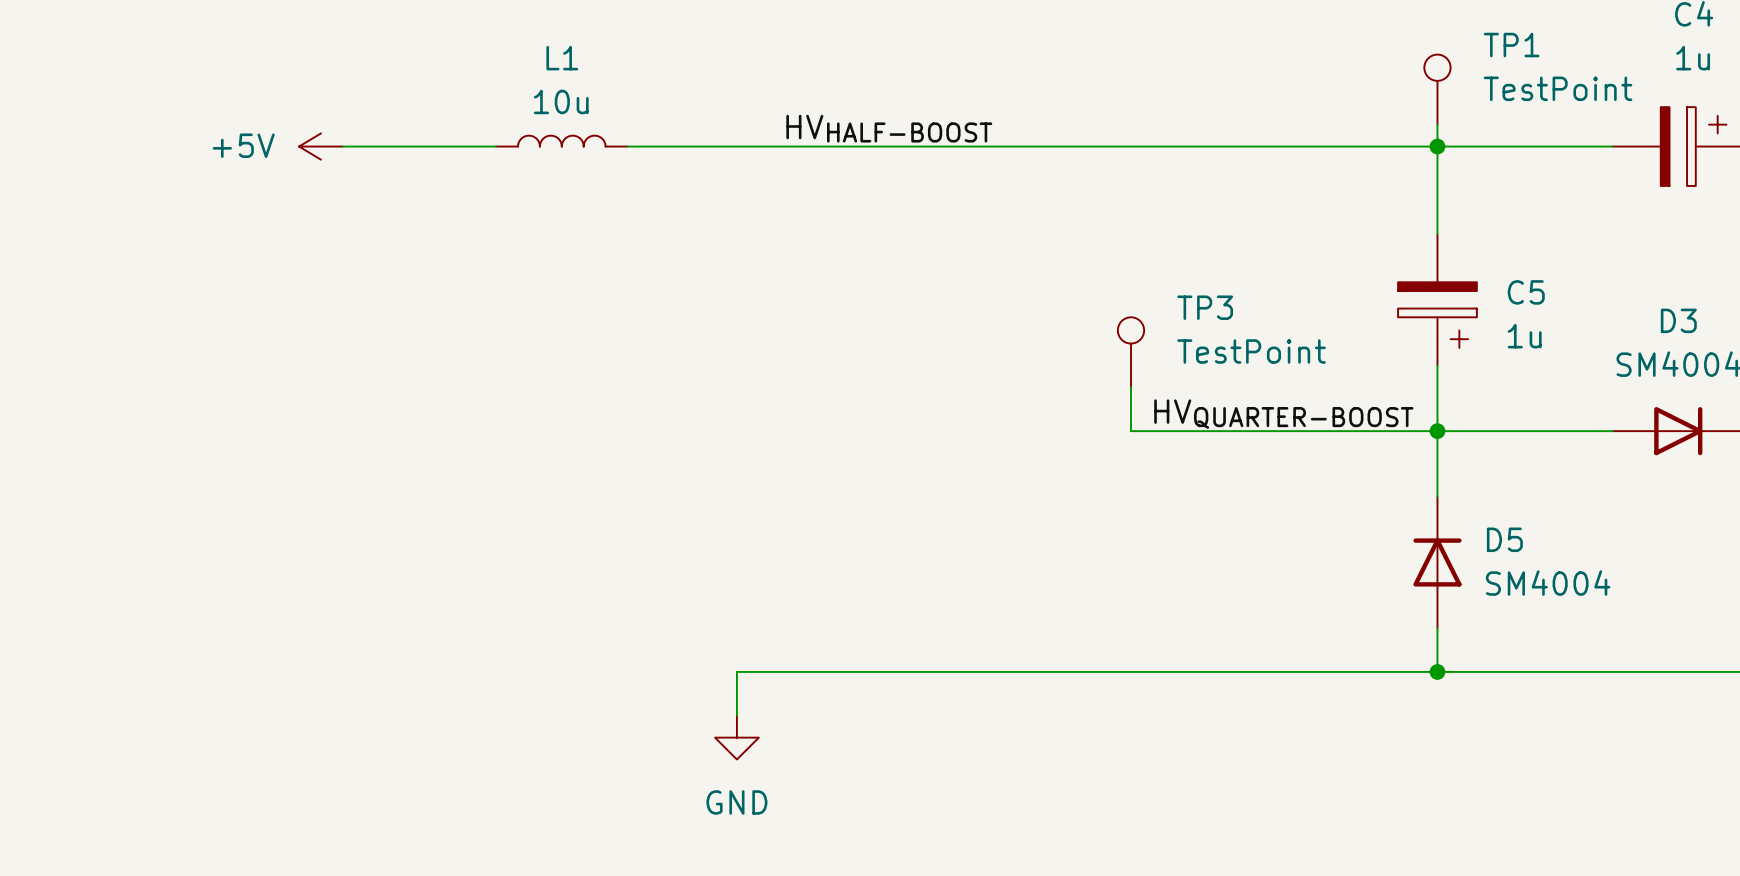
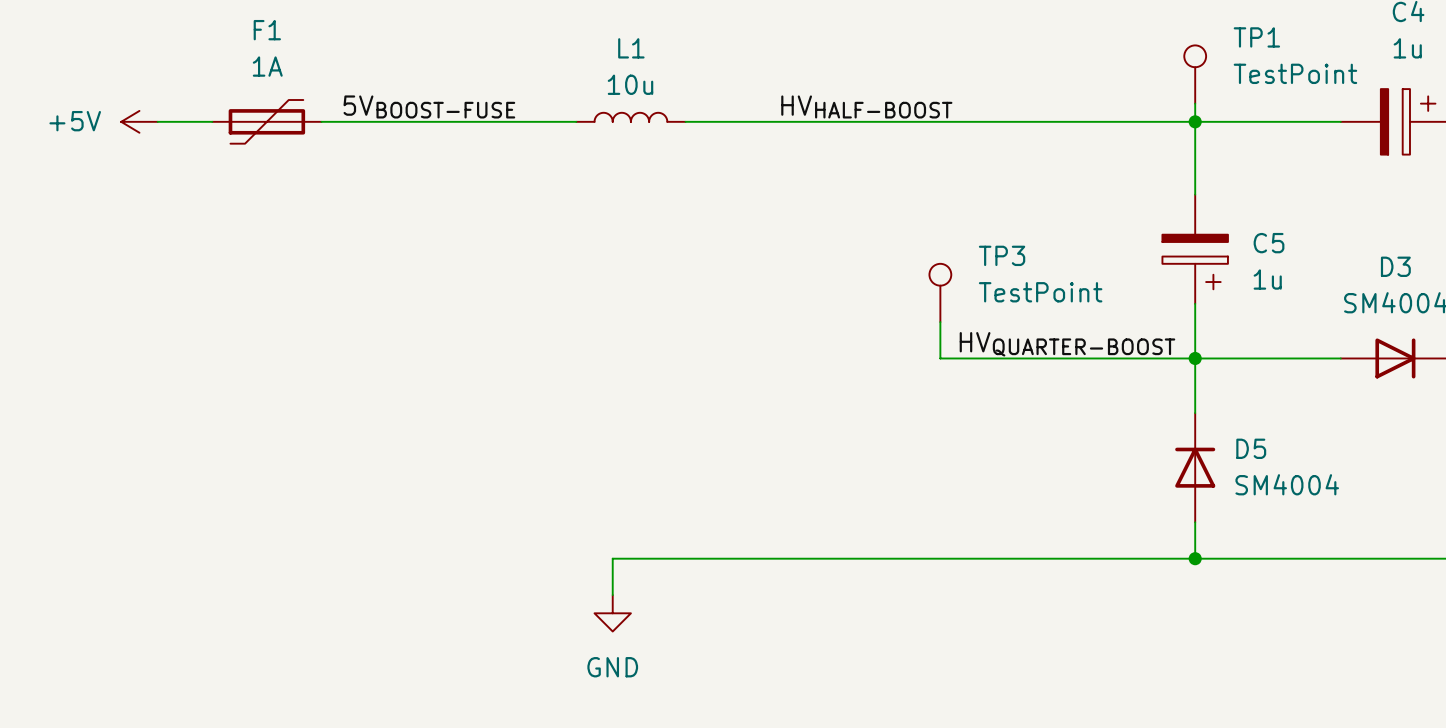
label: none -> 5VBOOST-FUSE (429, 106)
label position: HVHALF-BOOST (889, 128) -> HVHALF-BOOST (866, 106)
L1 position: (561, 141) -> (630, 117)
wire: none -> (157, 121) (212, 121)
power symbol position: +5V (320, 146) -> +5V (139, 121)
F1: none -> 1A (266, 121)
wire: (693, 146) (824, 146) -> (412, 121) (521, 121)

